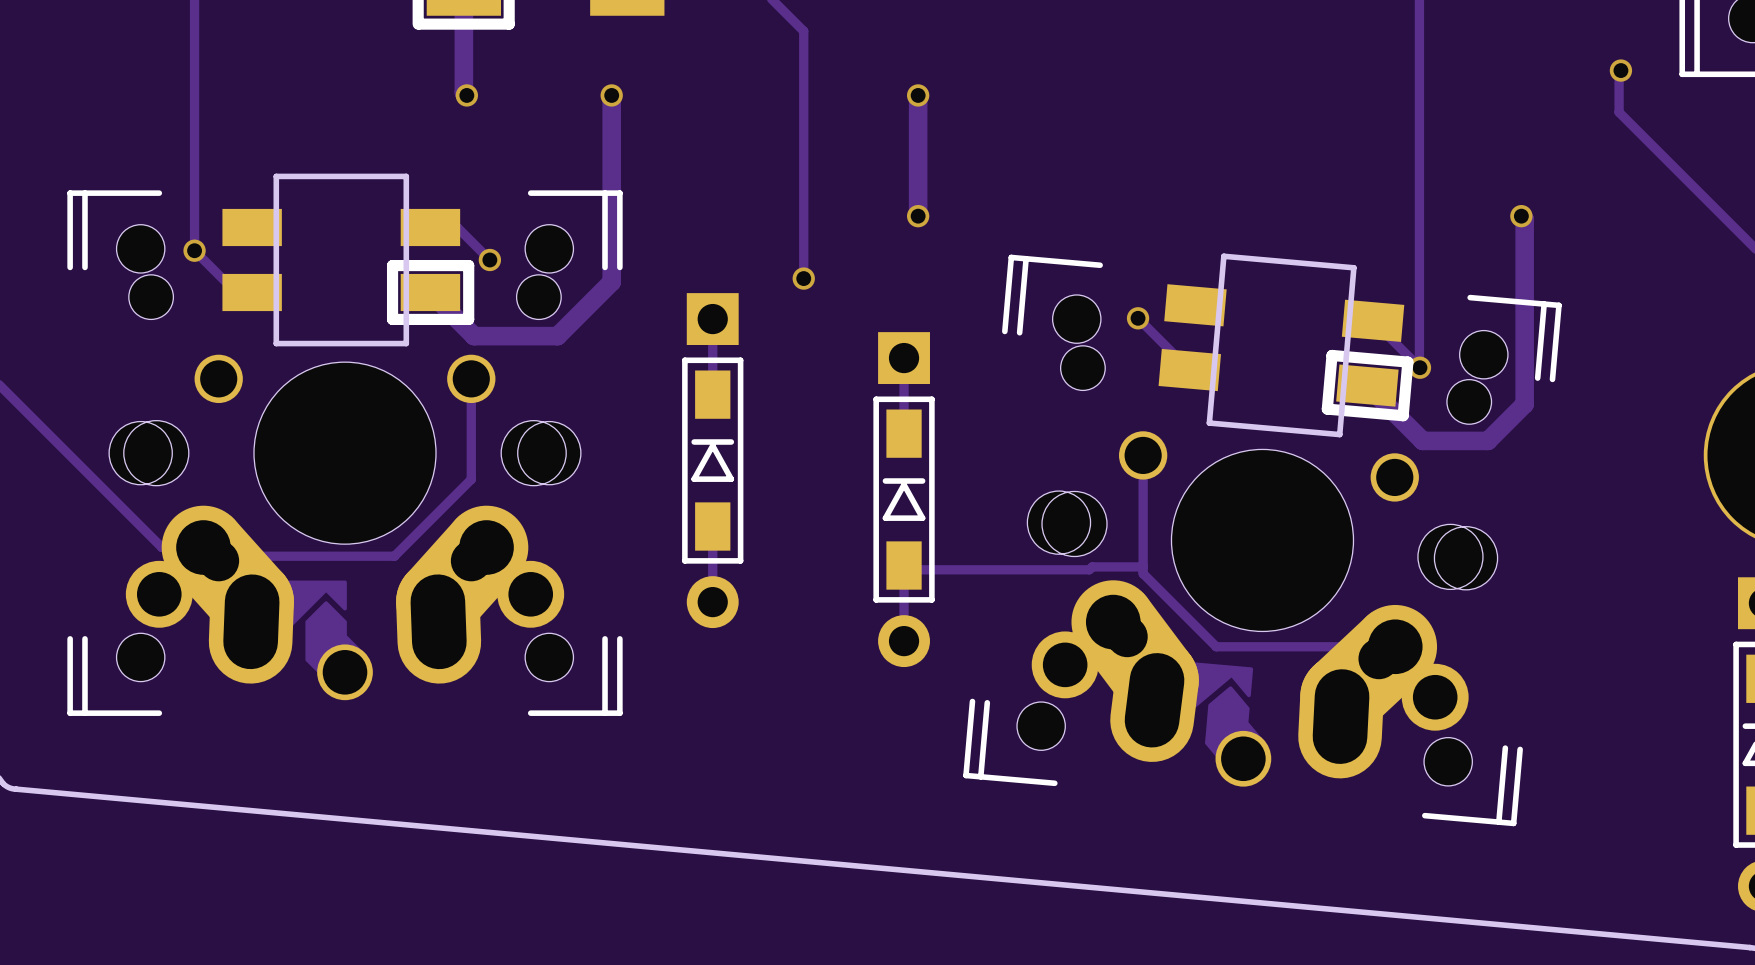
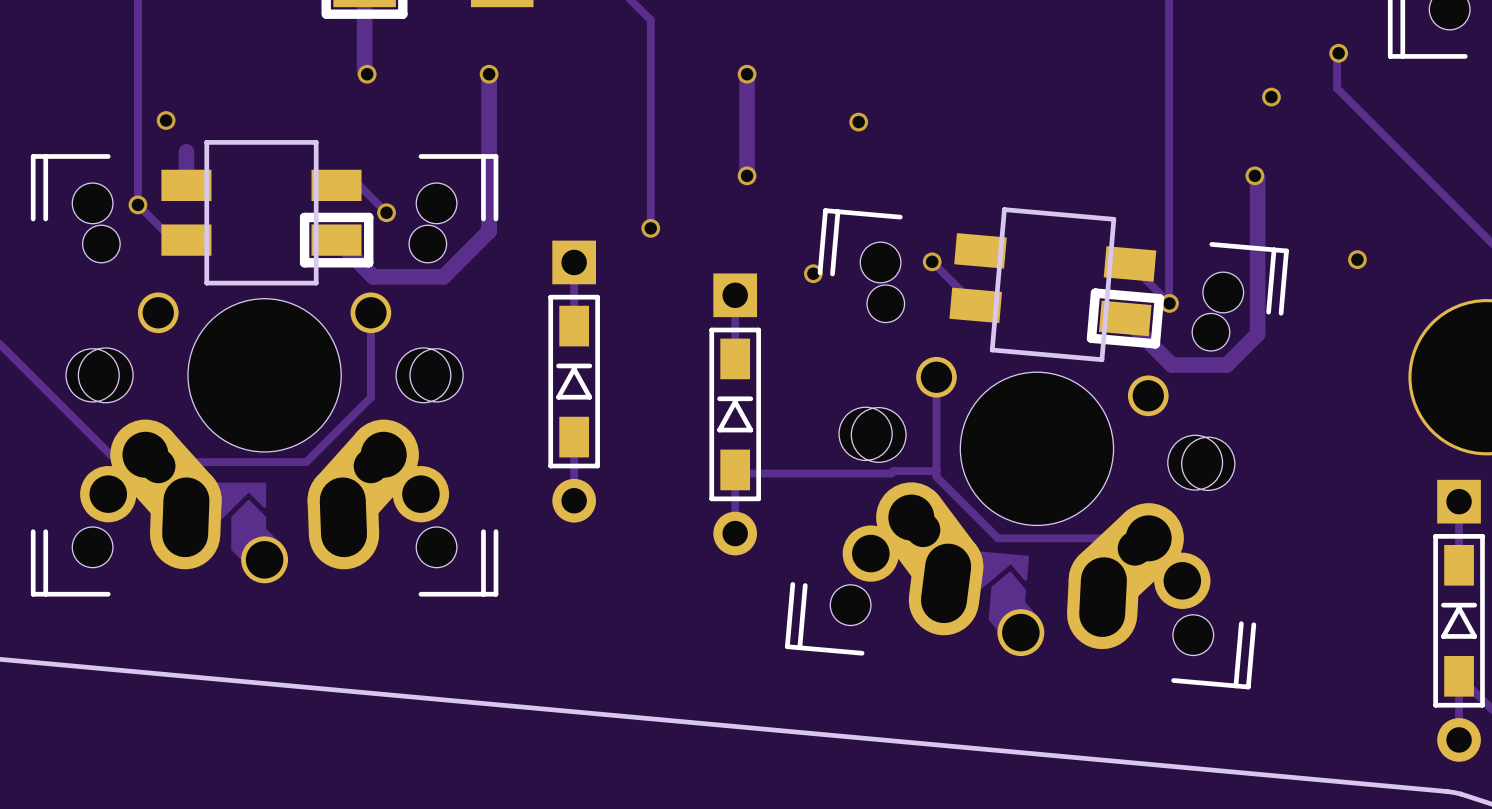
via: none -> (1271, 97)
via: none -> (166, 120)
via: none -> (858, 122)
track: none -> (186, 151) (186, 185)
via: none -> (1357, 259)
via: none -> (813, 273)

